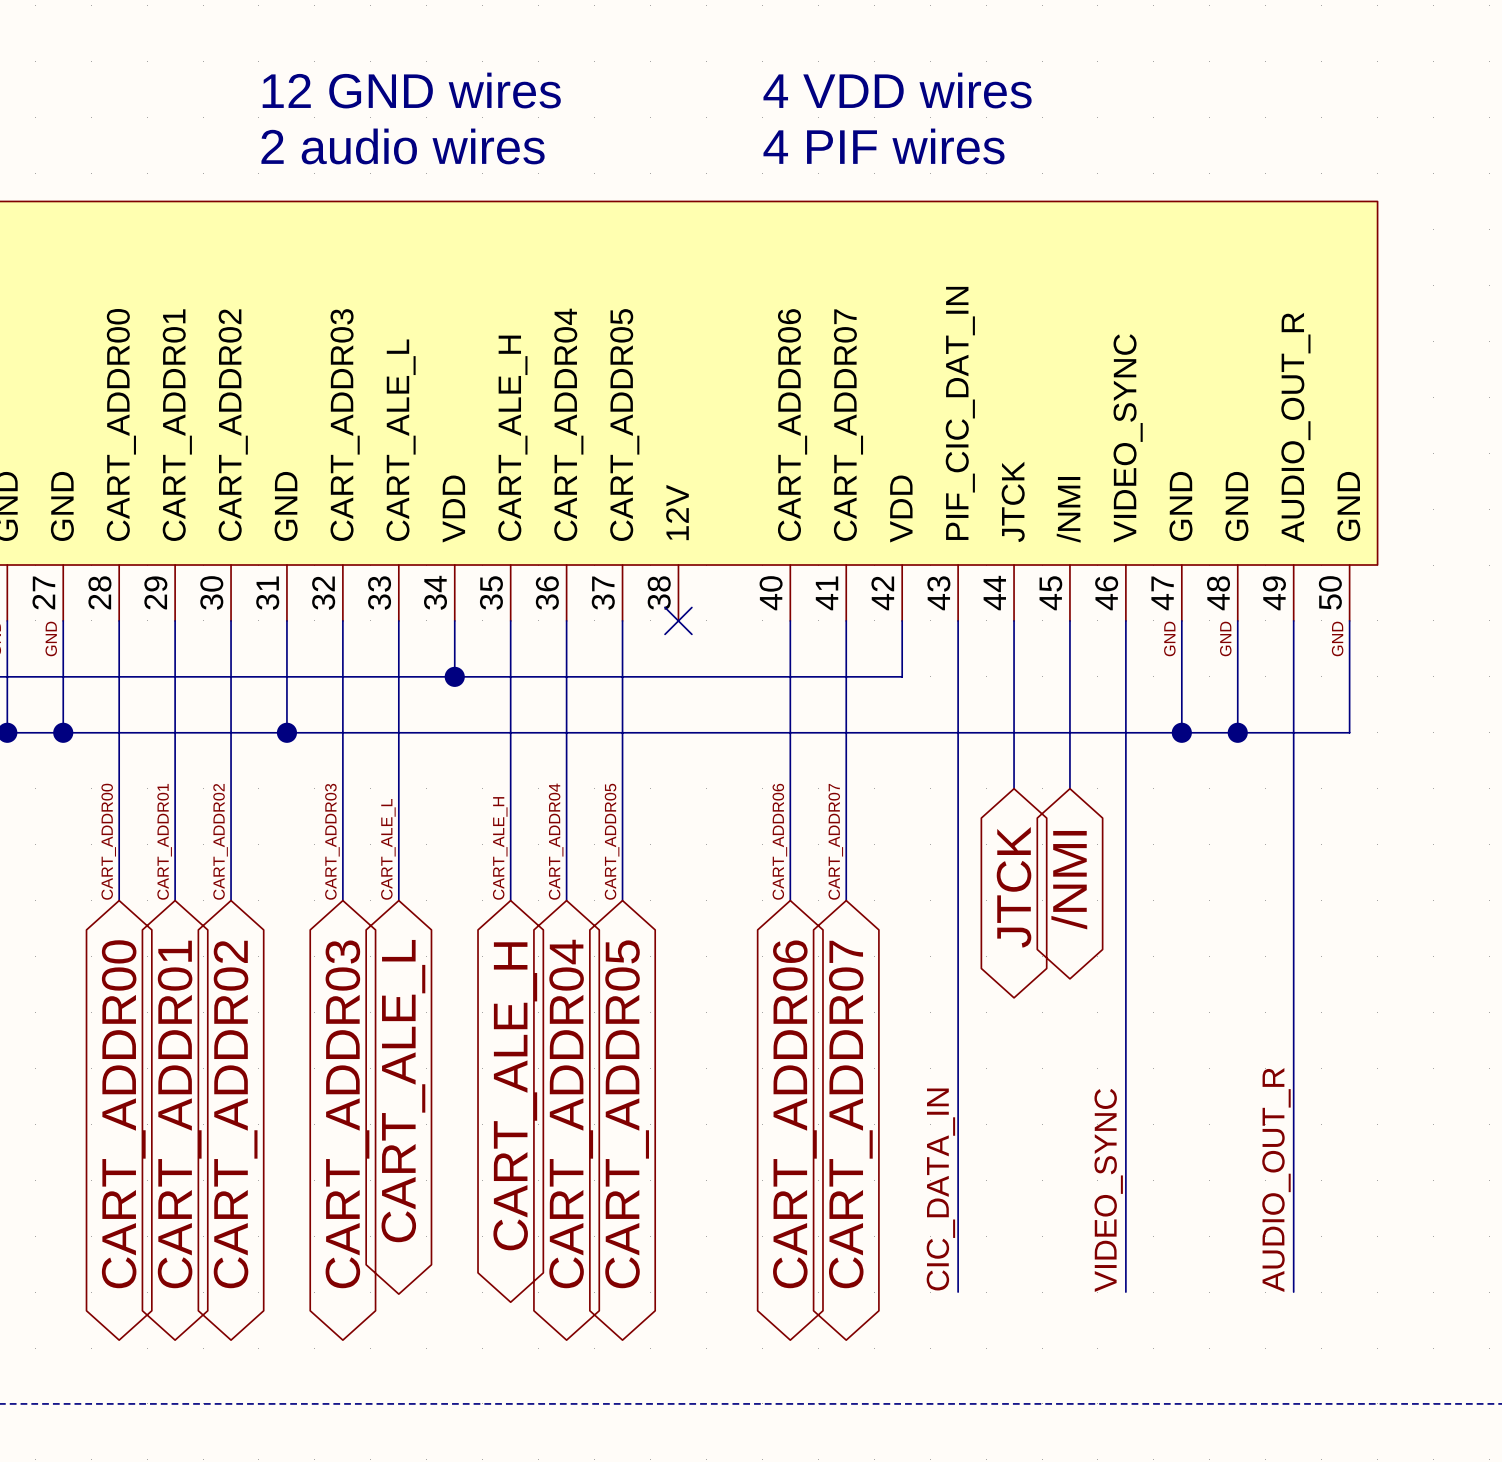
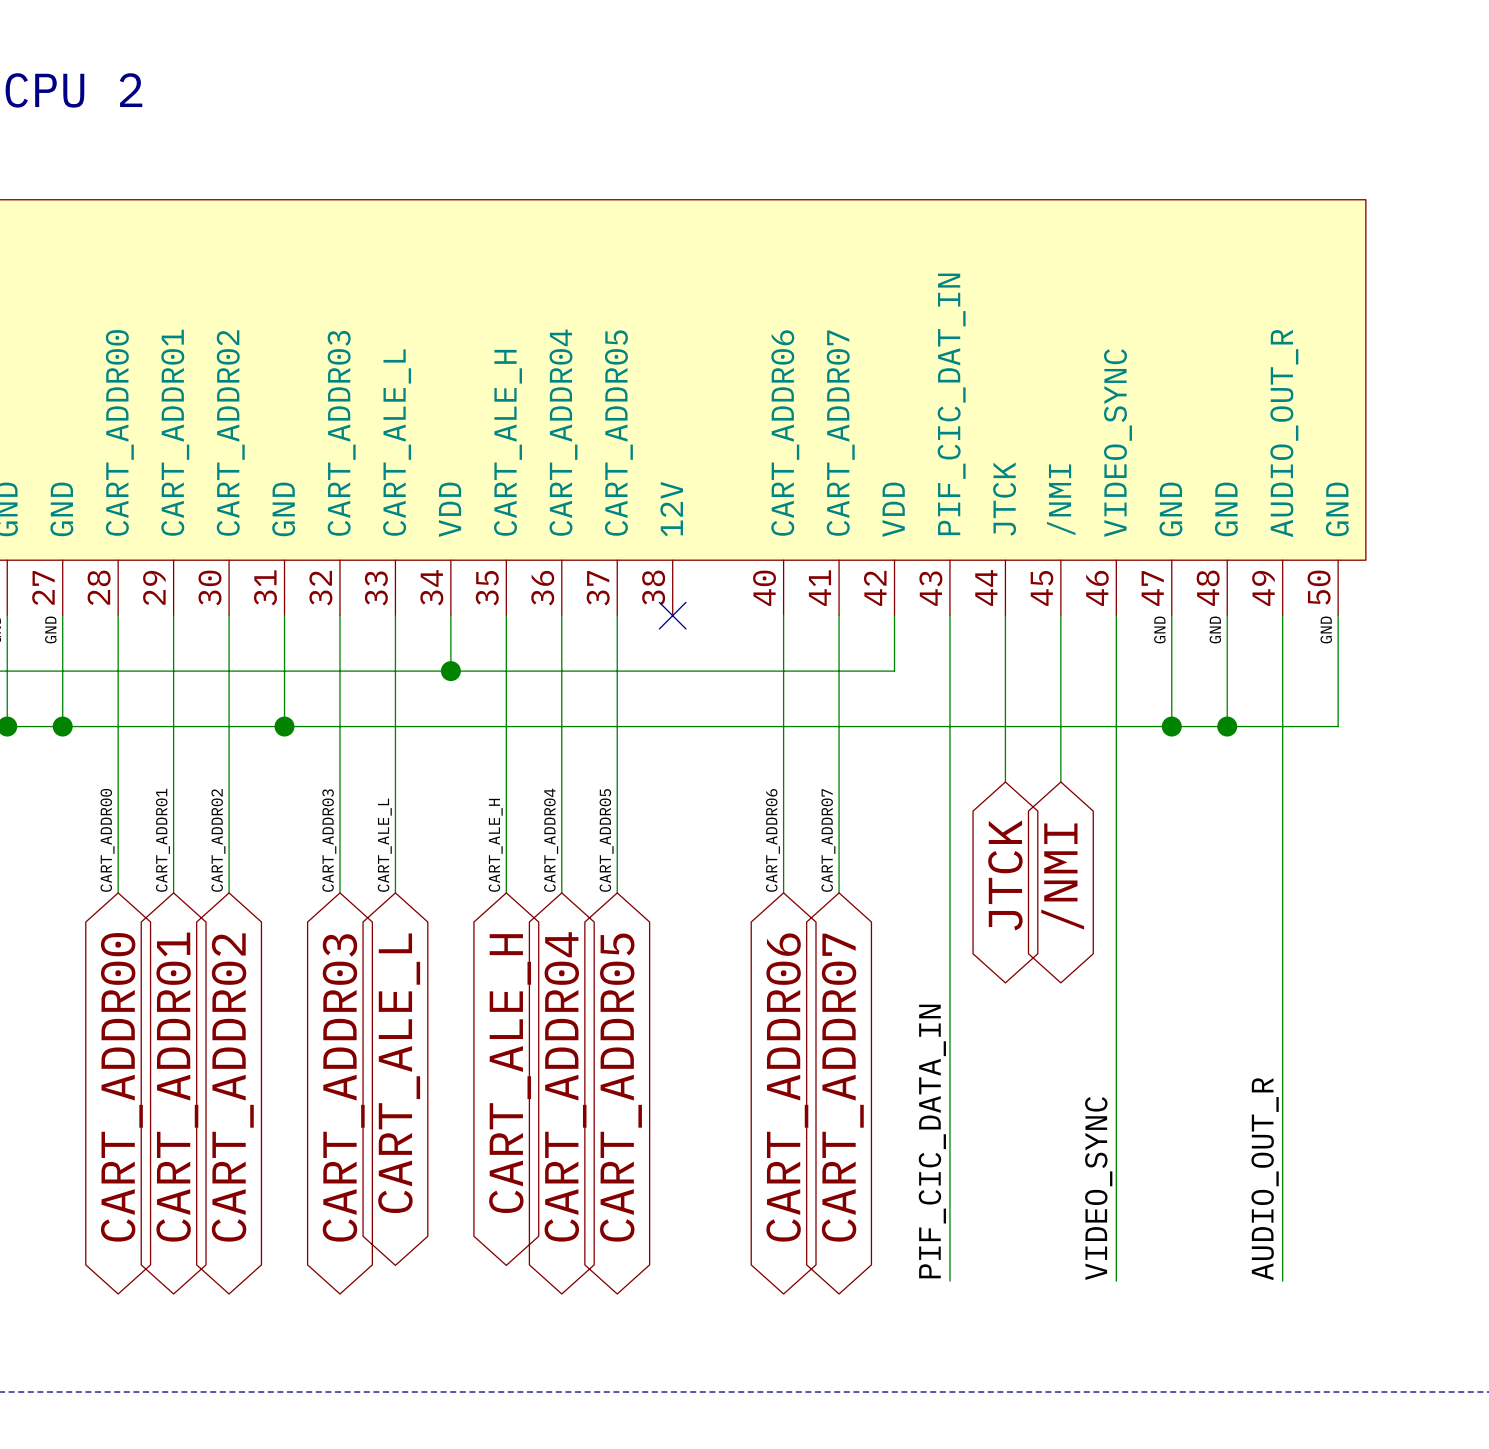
text: 12 GND wires (411, 90) -> none
text: 4 VDD wires (897, 90) -> none
text: 2 audio wires (403, 146) -> none
text: 4 PIF wires (884, 146) -> none
label: CIC_DATA_IN (940, 1189) -> PIF_CIC_DATA_IN (932, 1141)

